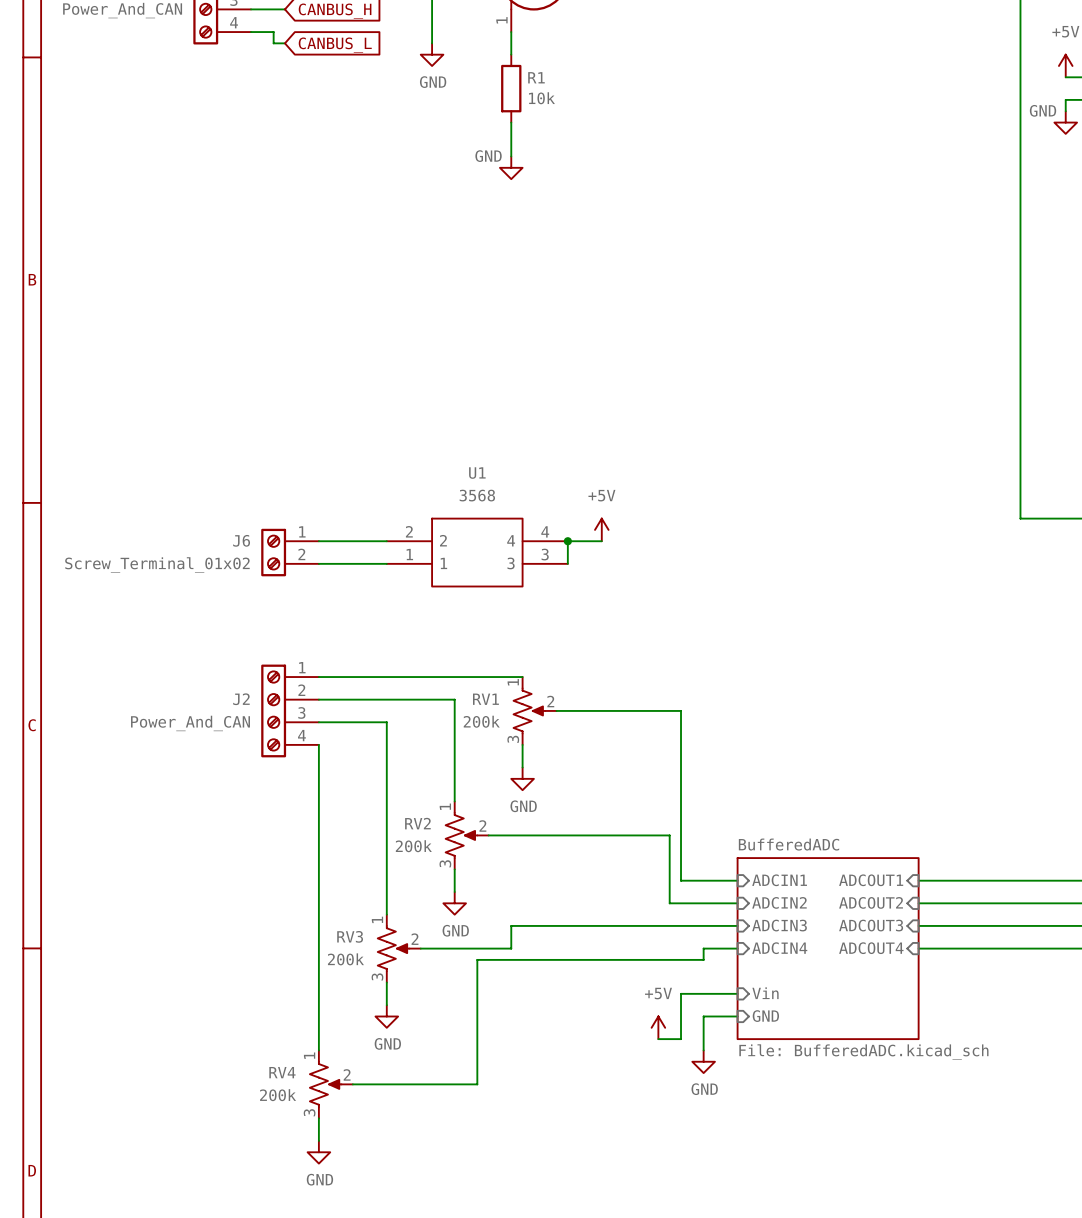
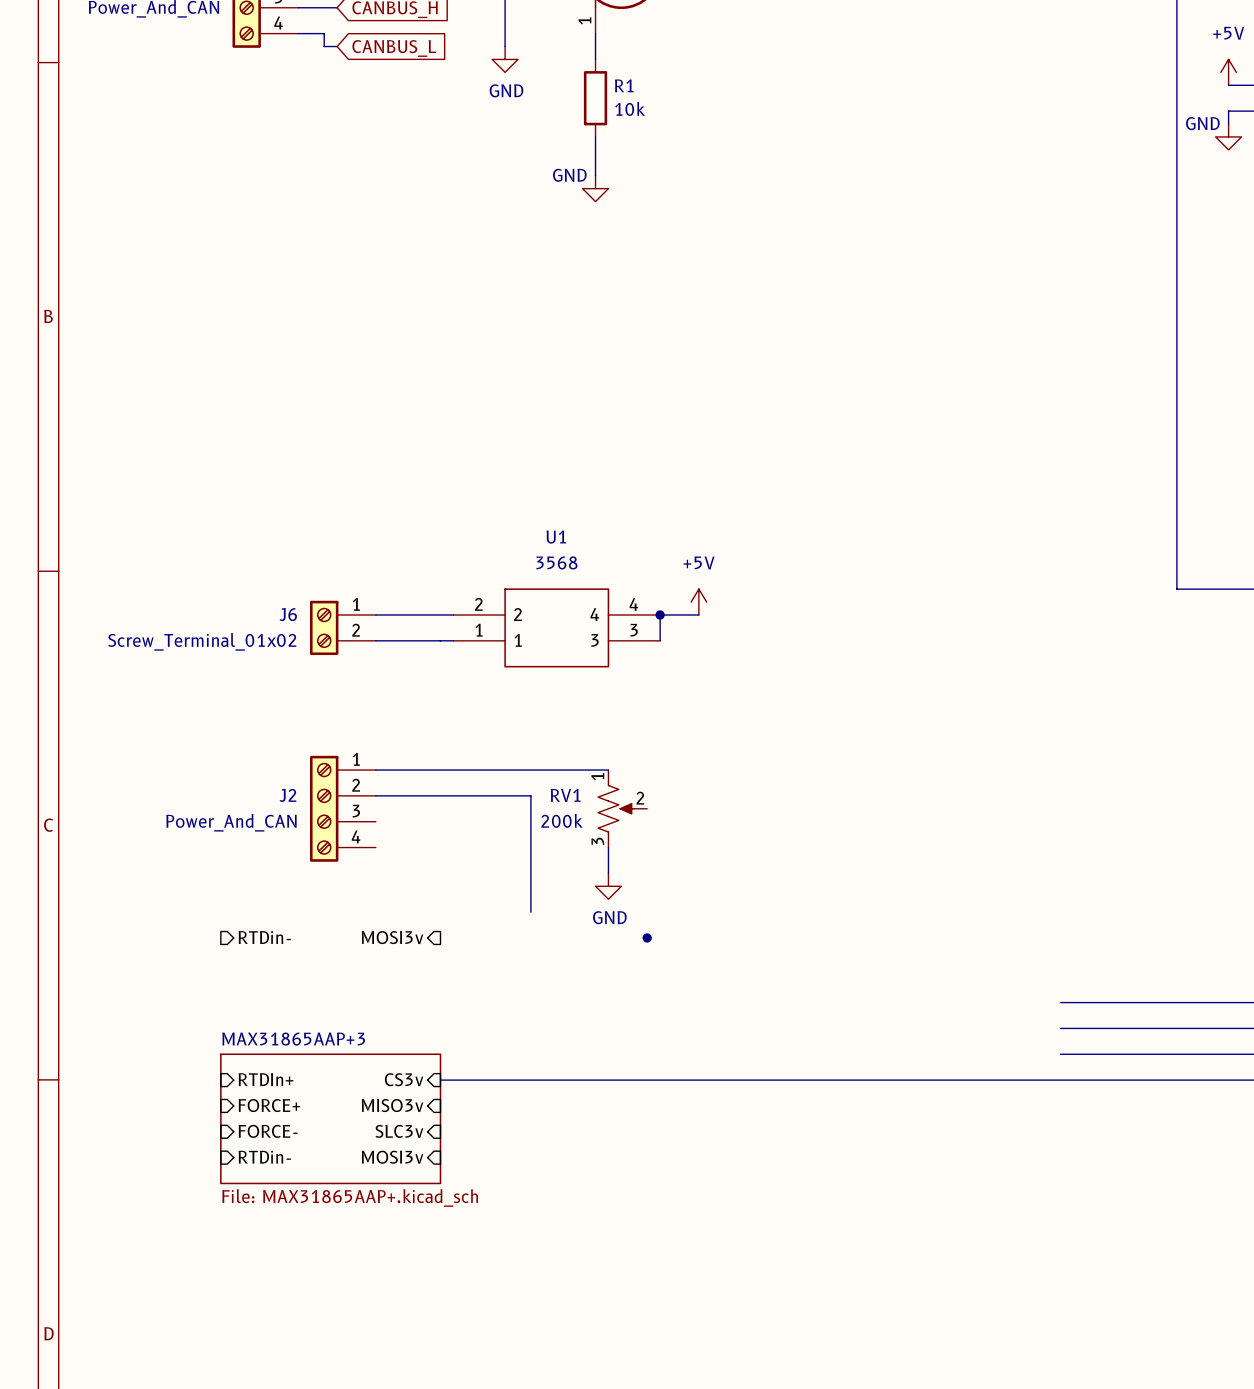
wire: (556, 710) (681, 710) (681, 880) (737, 880) -> none
wire: (318, 722) (386, 722) (386, 914) -> none
wire: (318, 744) (318, 1050) -> none
sheet pin: none -> RTDin- (264, 937)
sheet pin: none -> MOSI3v (392, 937)
junction: none -> (647, 937)
RV2: 200k (467, 835) -> none
wire: (488, 835) (669, 835) (669, 903) (737, 903) -> none
wire: (454, 869) (454, 892) -> none
sheet pin: ADCIN1 (779, 880) -> none
sheet pin: ADCOUT1 (871, 880) -> none
sheet pin: ADCIN2 (779, 902) -> none
sheet pin: ADCOUT2 (871, 902) -> none
power symbol: GND (454, 903) -> none
wire: (737, 925) (511, 925) (511, 948) -> (815, 1080) (595, 1080)
sheet pin: ADCIN3 (779, 925) -> none
sheet pin: ADCOUT3 (871, 925) -> none
sheet pin: none -> RTDIn+ (265, 1079)
sheet pin: none -> CS3v (404, 1079)
RV3: 200k (399, 948) -> none
wire: (703, 948) (703, 959) (477, 959) (477, 1084) (352, 1084) -> none
wire: none -> (853, 1080) (1060, 1080)
sheet pin: ADCIN4 (779, 948) -> none
sheet BufferedADC: File: BufferedADC.kicad_sch (828, 948) -> none
sheet pin: ADCOUT4 (871, 948) -> none
sheet pin: none -> FORCE+ (269, 1105)
sheet pin: none -> MISO3v (392, 1105)
sheet MAX31865AAP+3: none -> File: MAX31865AAP+.kicad_sch (330, 1118)
wire: (386, 982) (386, 1005) -> none
sheet pin: none -> FORCE- (268, 1131)
sheet pin: none -> SLC3v (399, 1131)
wire: (737, 993) (681, 993) (681, 1039) (658, 1039) -> none
sheet pin: Vin (765, 993) -> none
sheet pin: none -> RTDin- (264, 1157)
sheet pin: none -> MOSI3v (392, 1157)
power symbol: GND (386, 1016) -> none
wire: (737, 1016) (703, 1016) (703, 1050) -> none
sheet pin: GND (765, 1016) -> none
power symbol: +5V (658, 1027) -> none
power symbol: GND (703, 1061) -> none
RV4: 200k (331, 1084) -> none
wire: (318, 1118) (318, 1140) -> none
power symbol: GND (318, 1152) -> none

